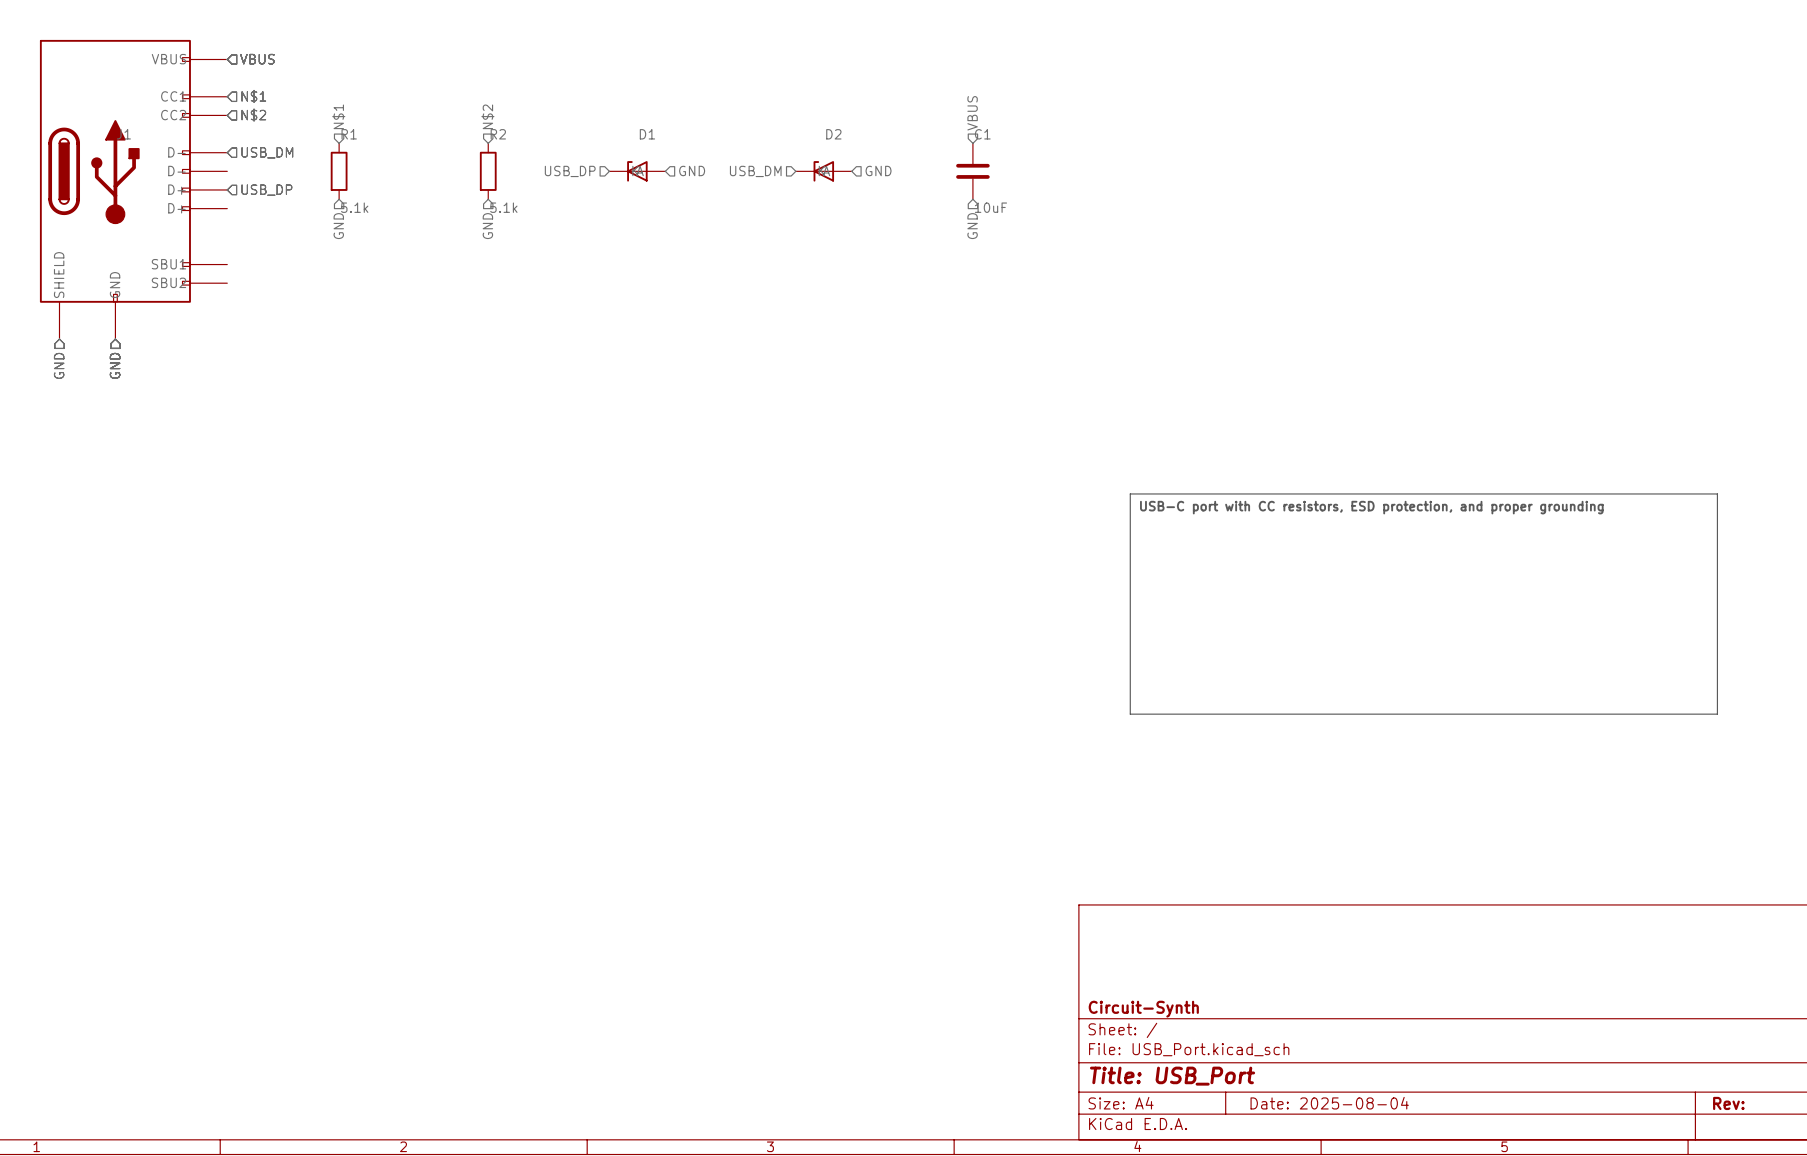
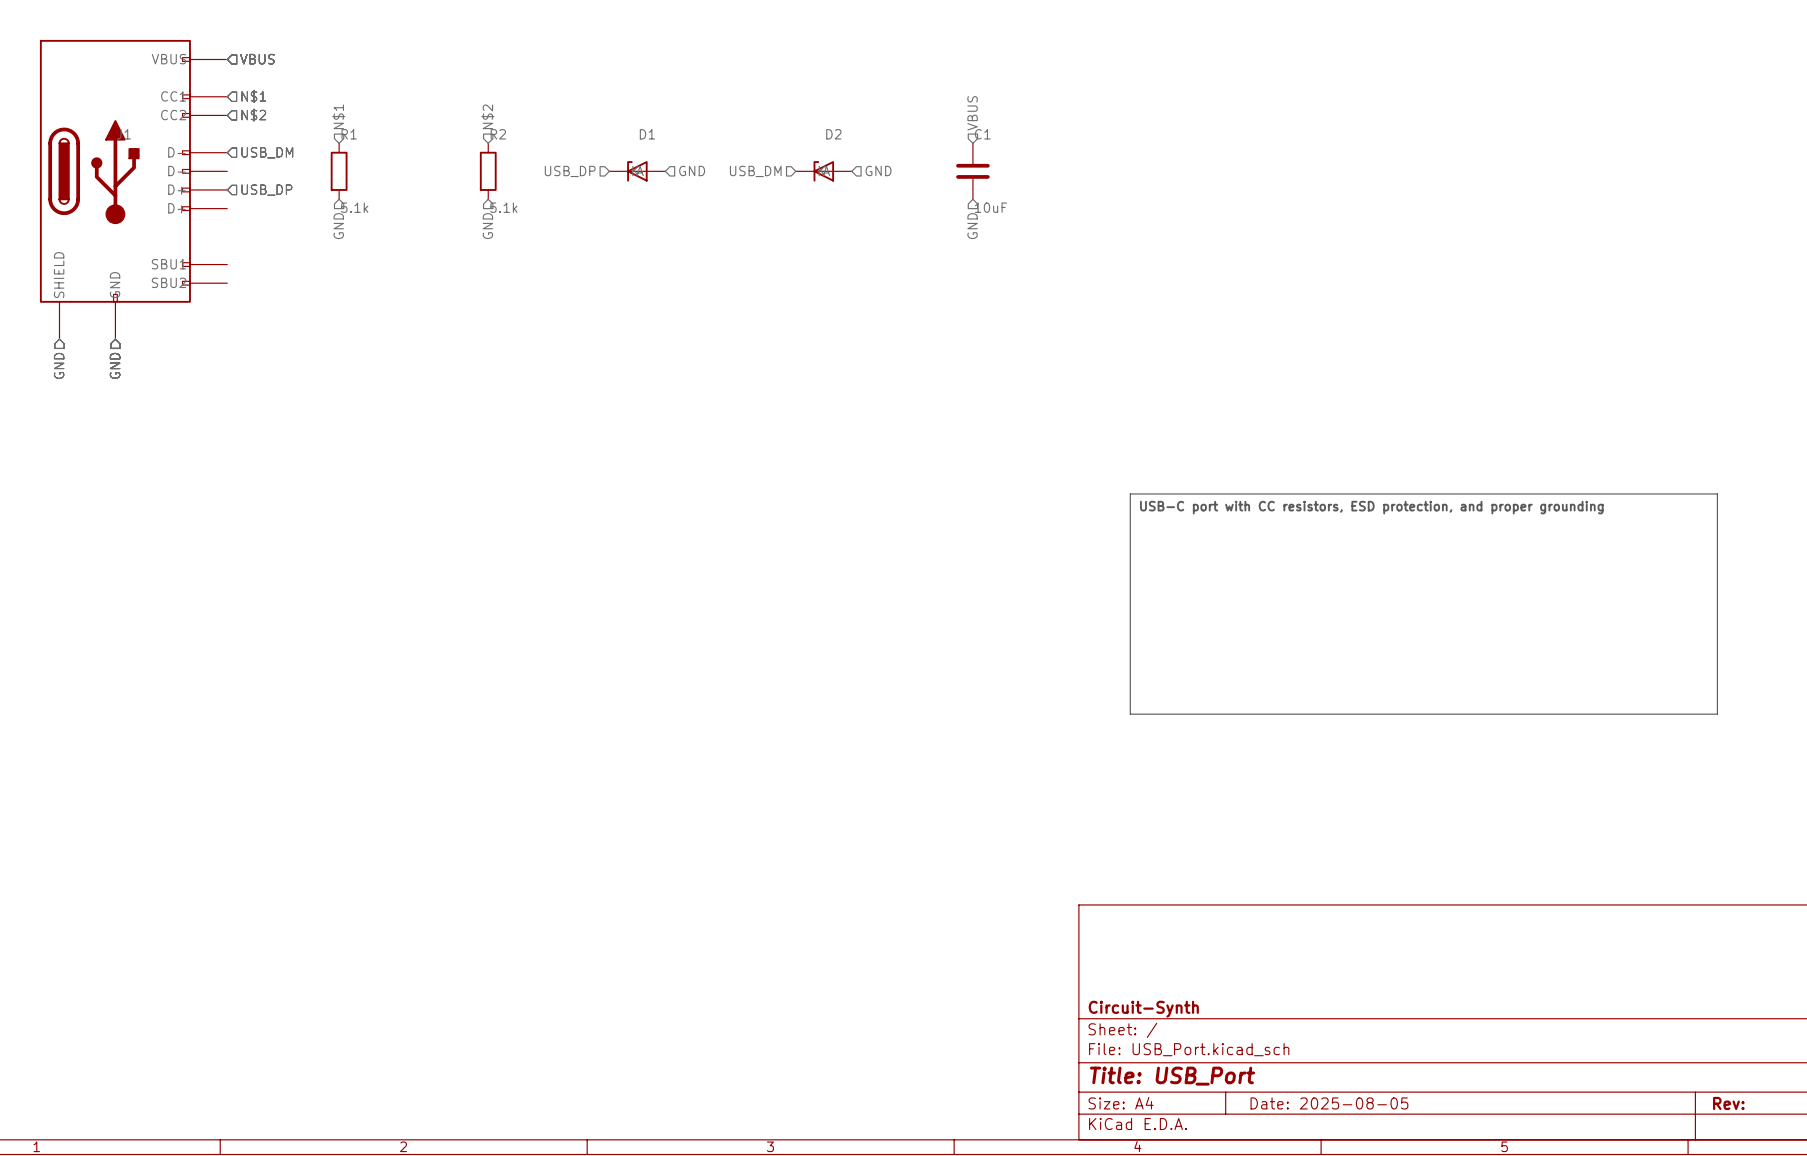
title block: Date: 2025-08-04 (1329, 1103) -> Date: 2025-08-05 (1329, 1103)

